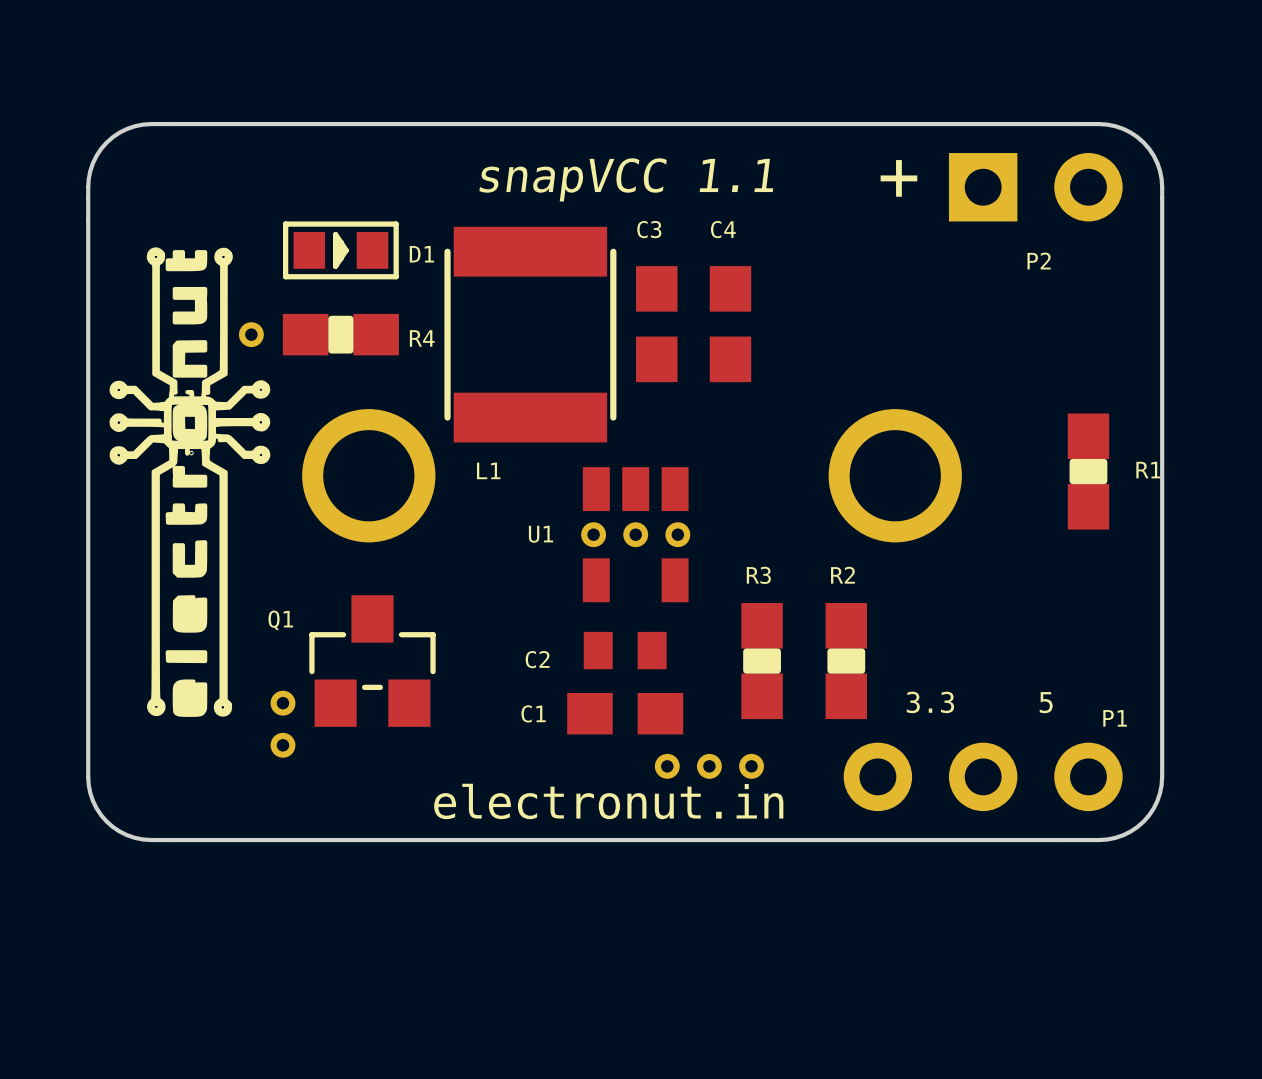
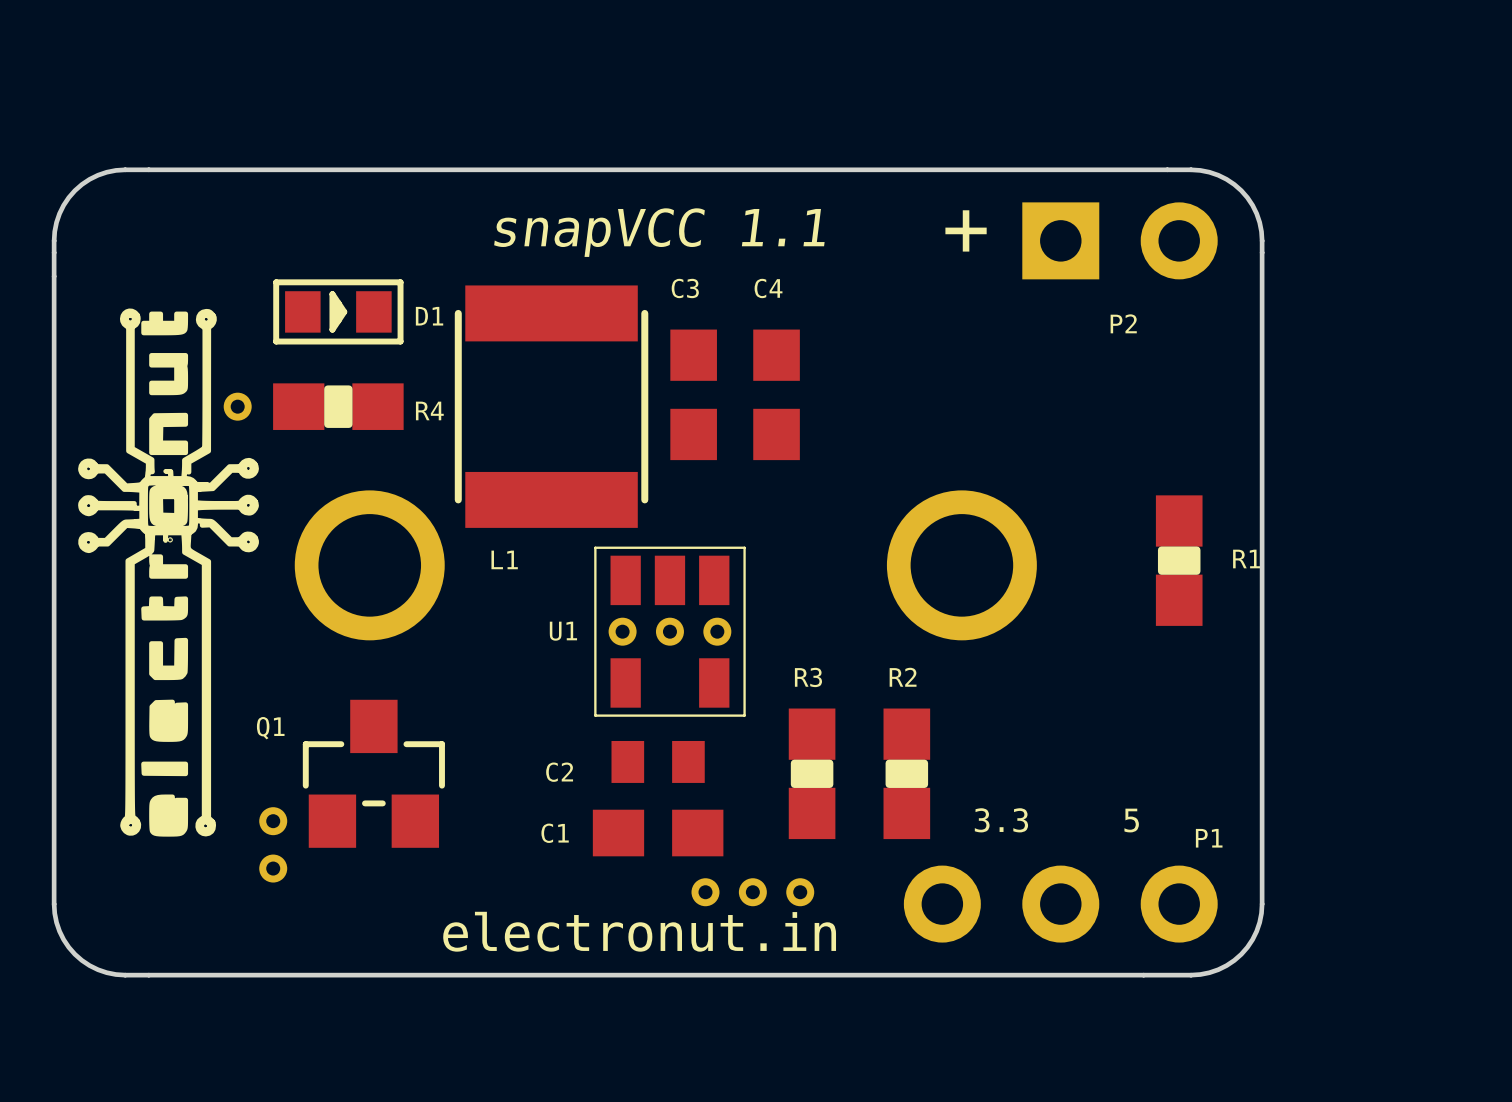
U1 footprint: [582, 467, 689, 603] -> [594, 546, 746, 717]

